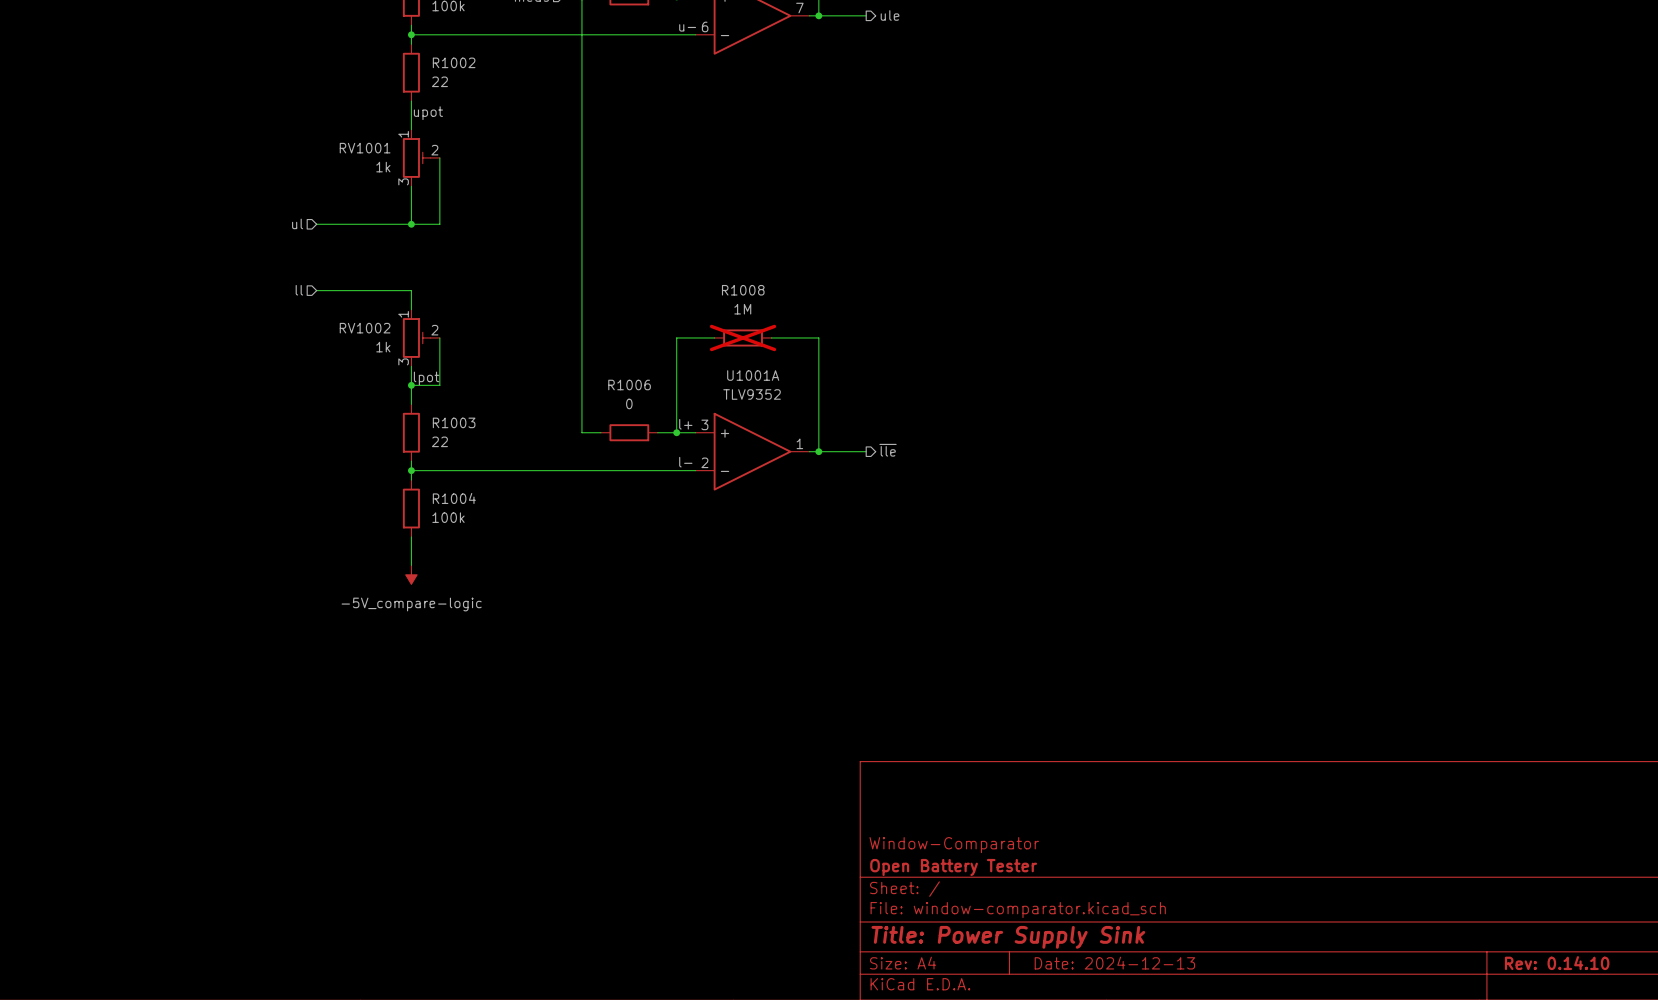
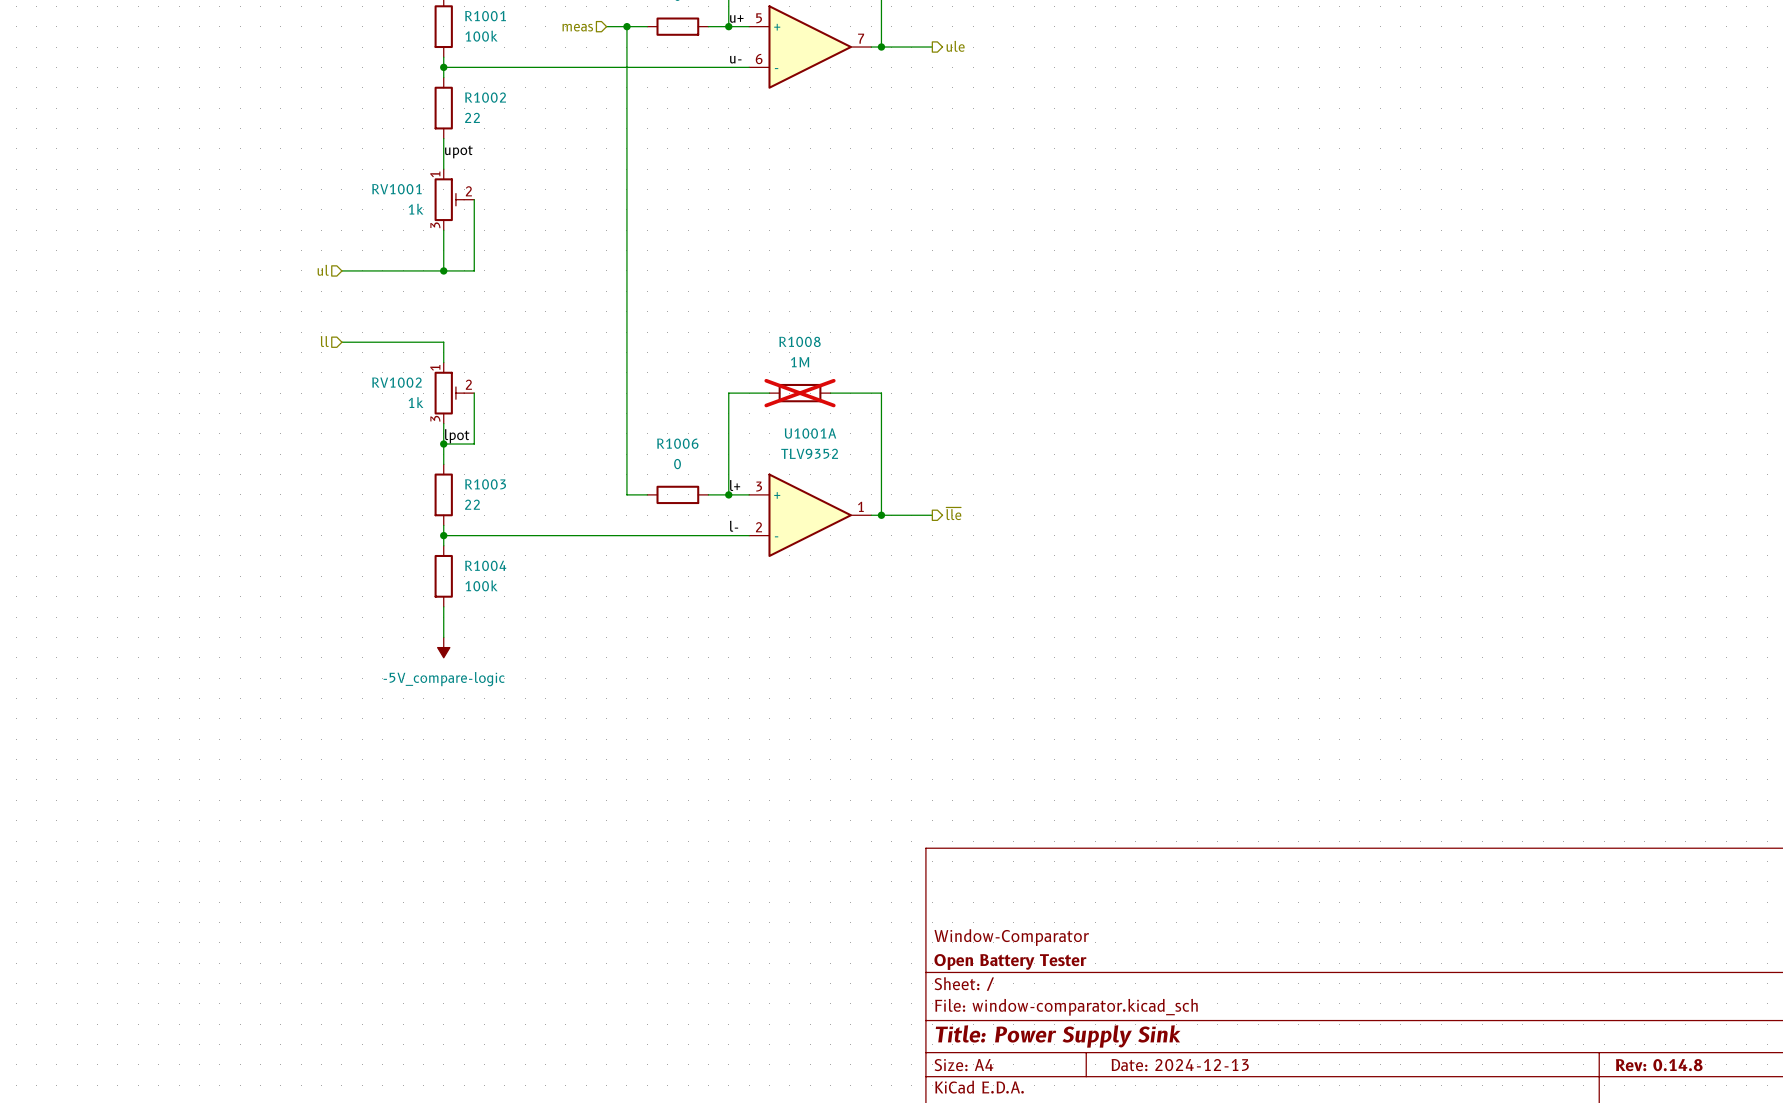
title block: Rev: 0.14.10 (1557, 963) -> Rev: 0.14.8 (1659, 1065)

